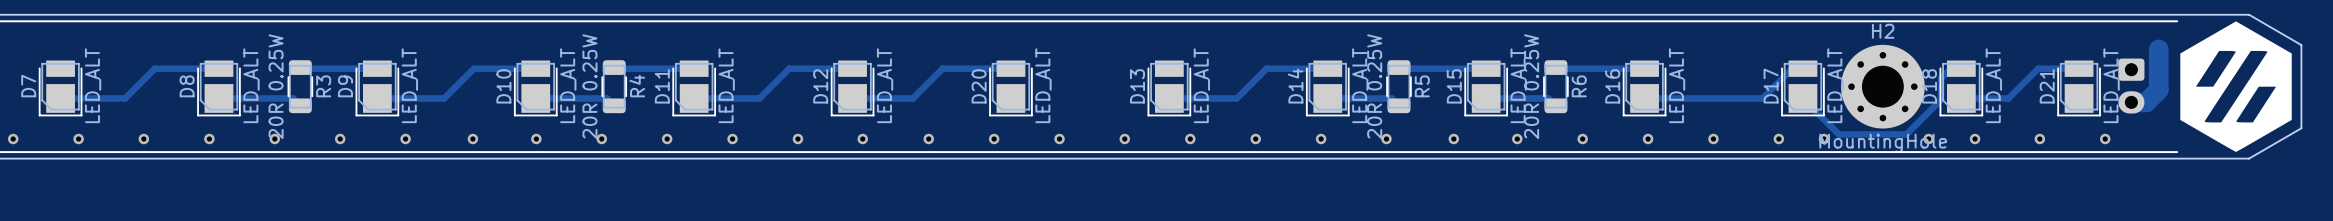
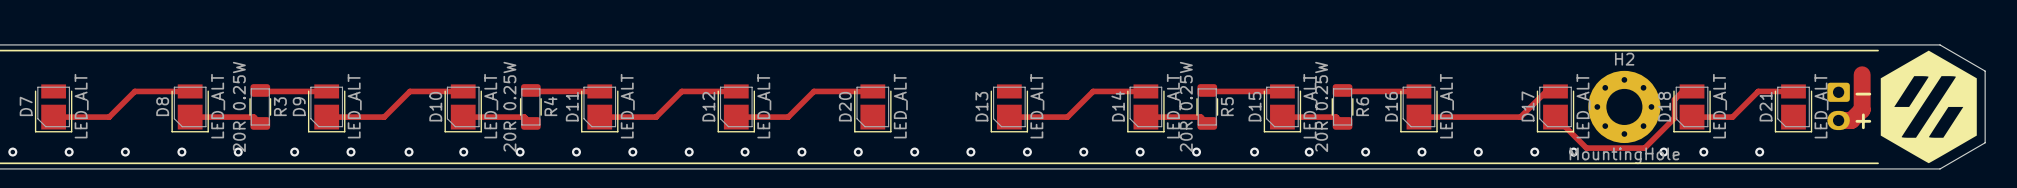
text: none -> - (1863, 94)
text: none -> + (1863, 121)
via: (2105, 139) -> none

